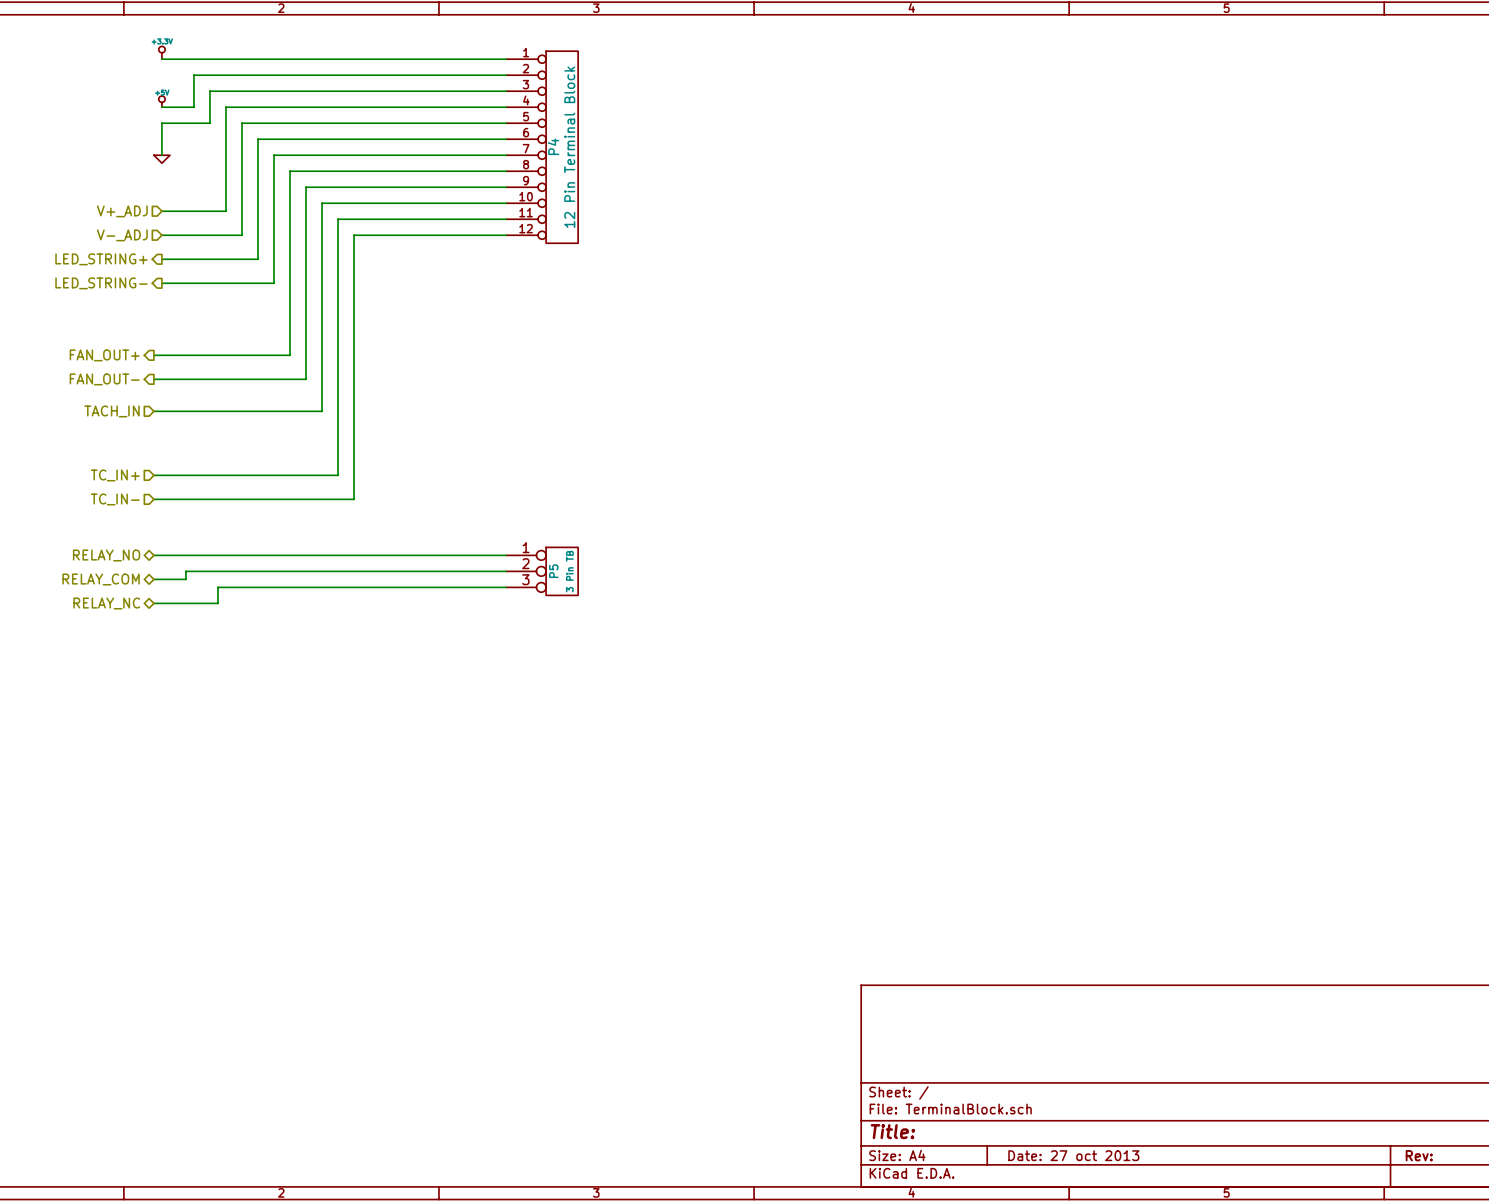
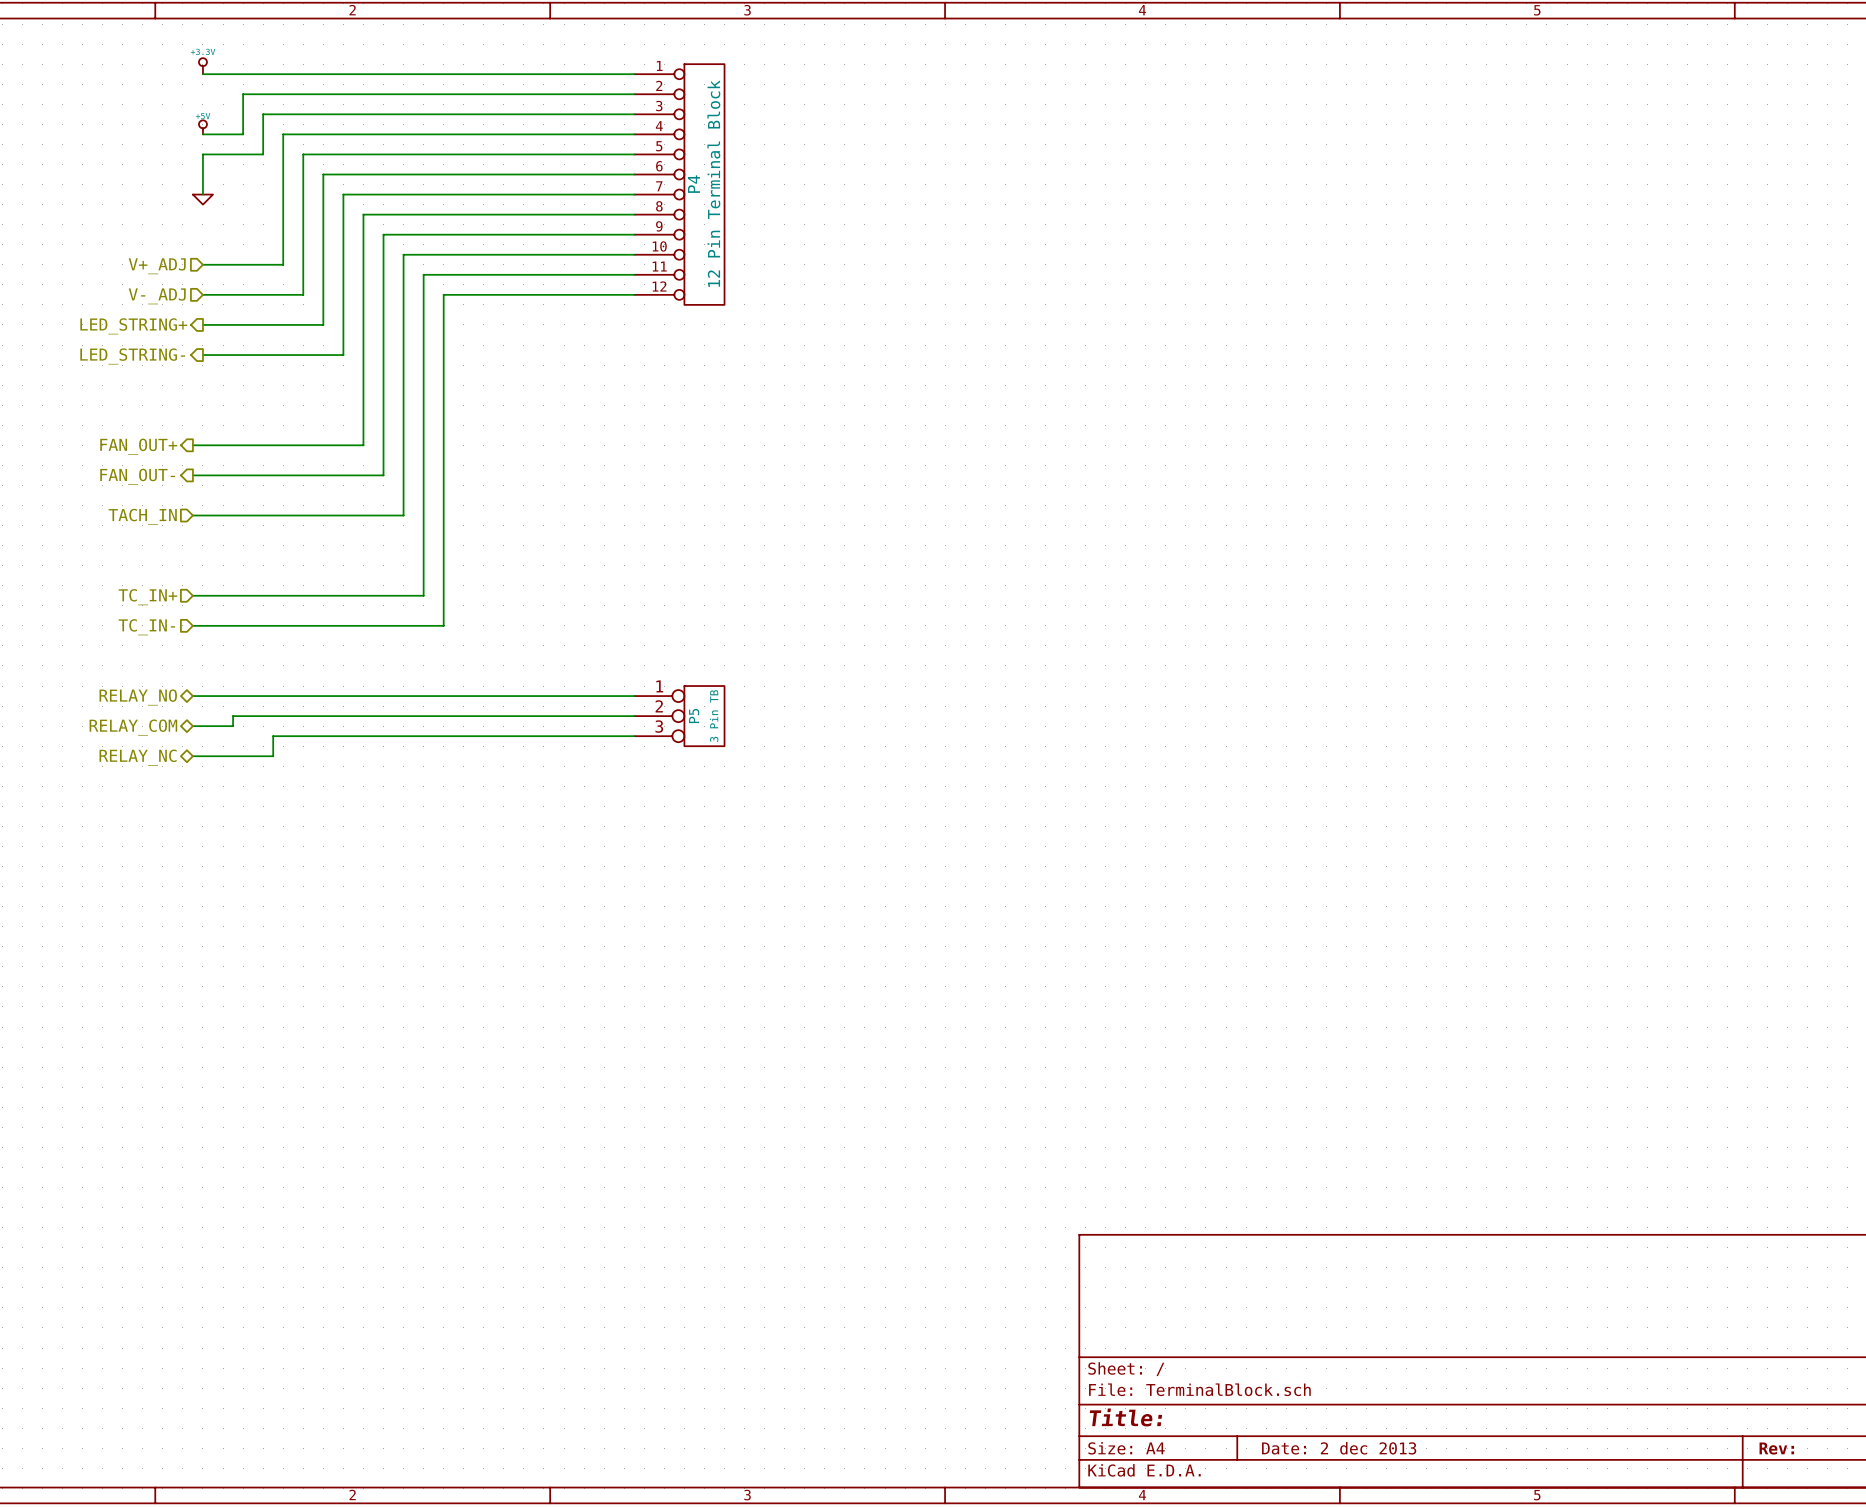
title block: Date: 27 oct 2013 (1073, 1155) -> Date: 2 dec 2013 (1339, 1448)

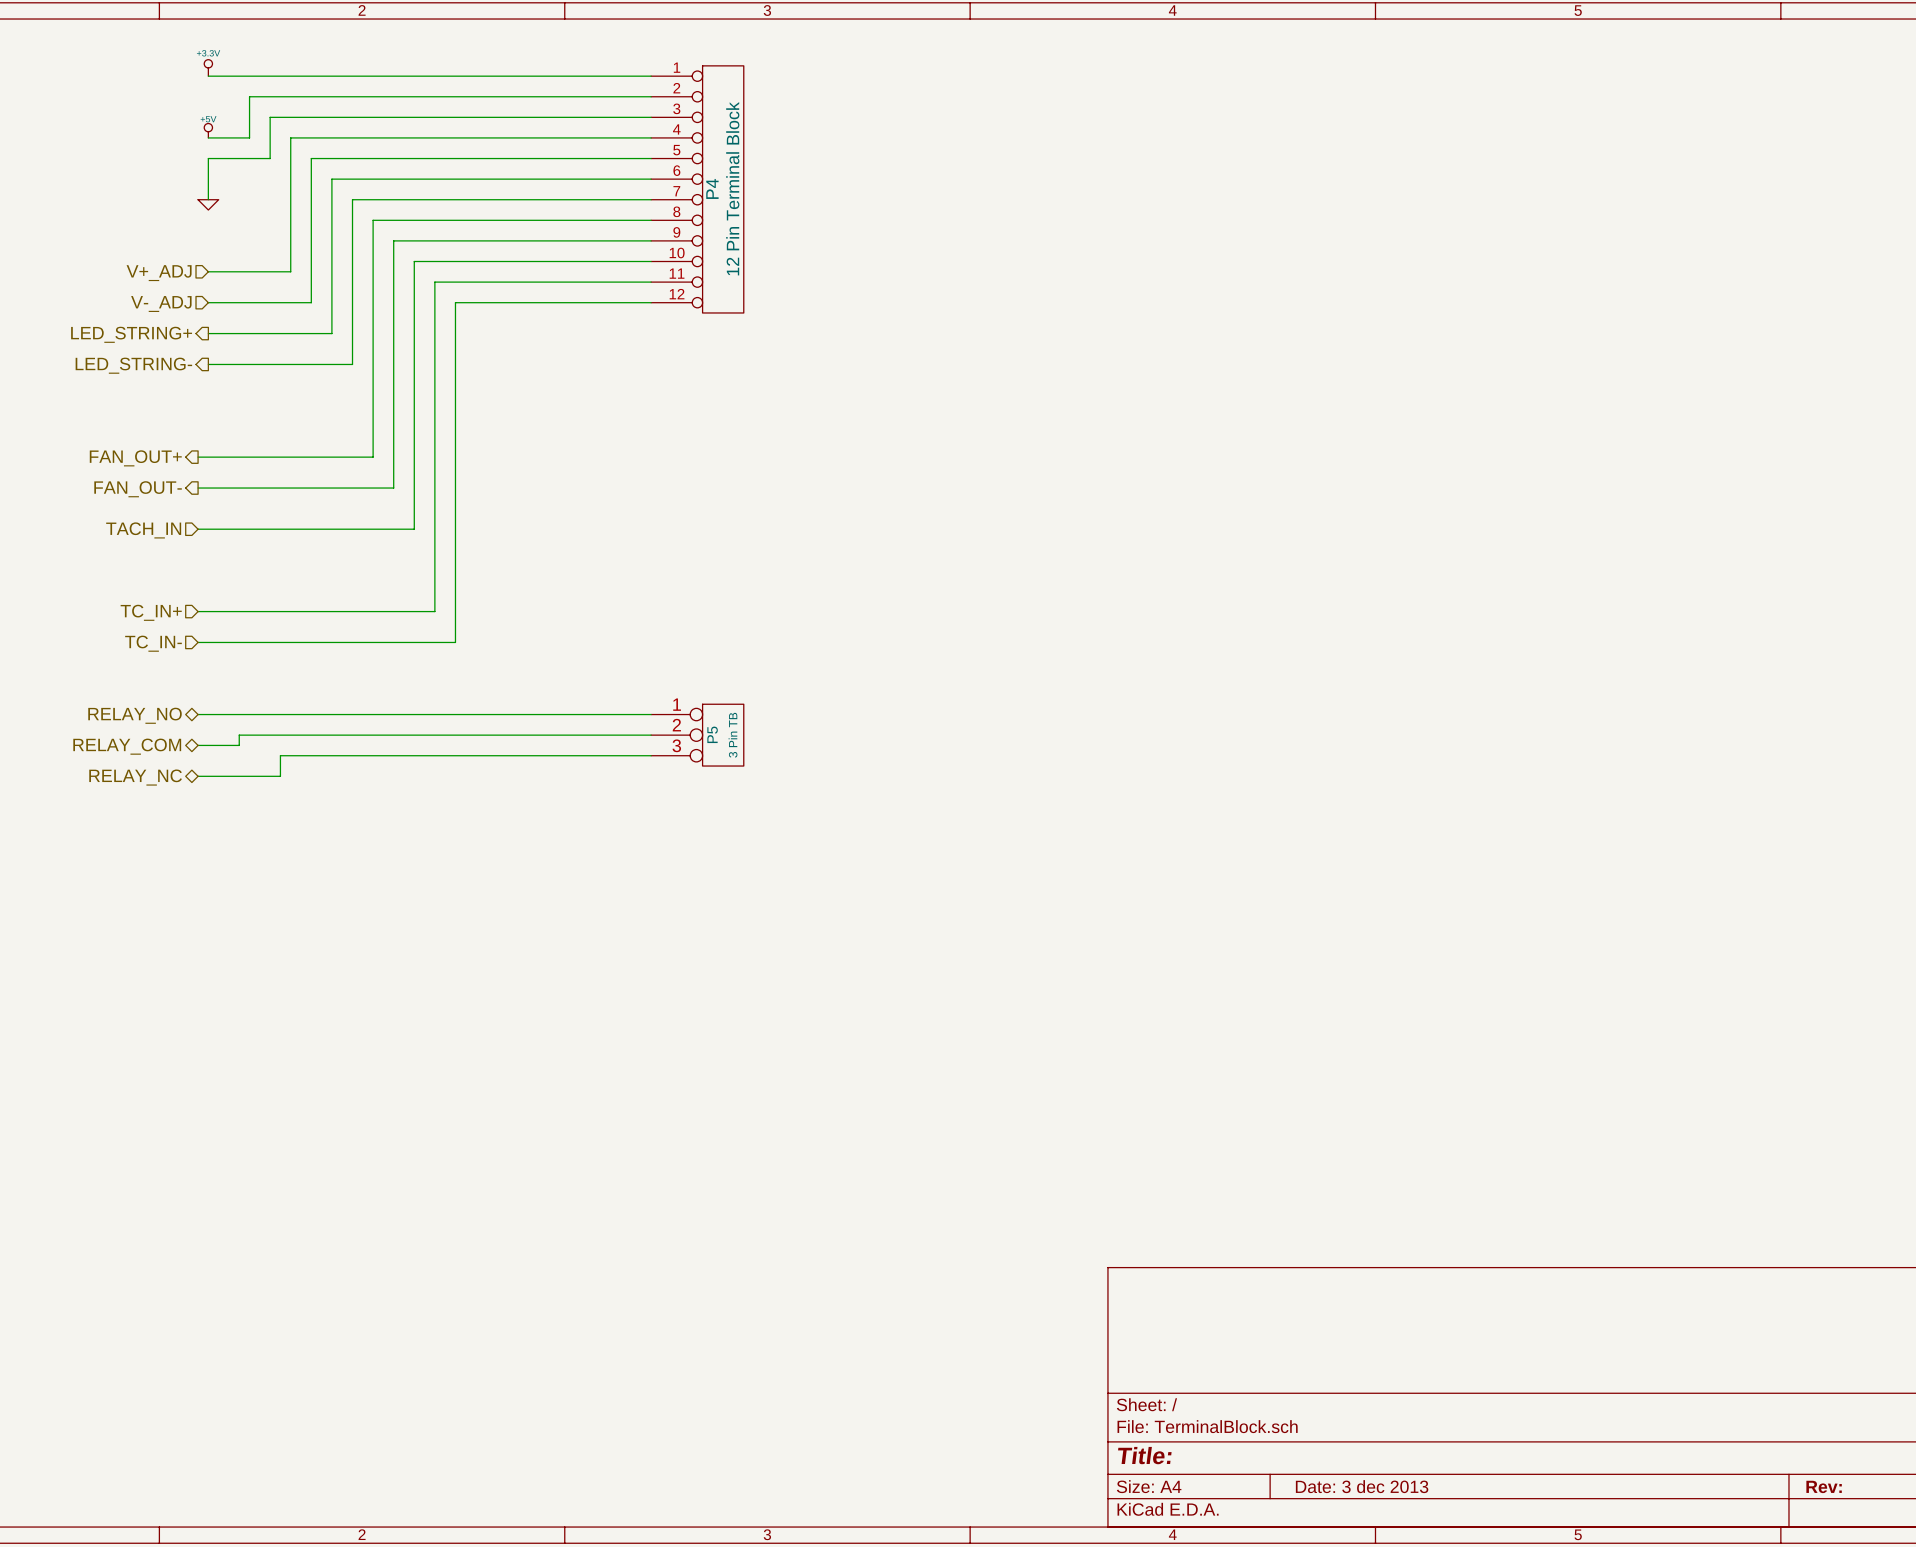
title block: Date: 2 dec 2013 (1339, 1448) -> Date: 3 dec 2013 (1362, 1486)

